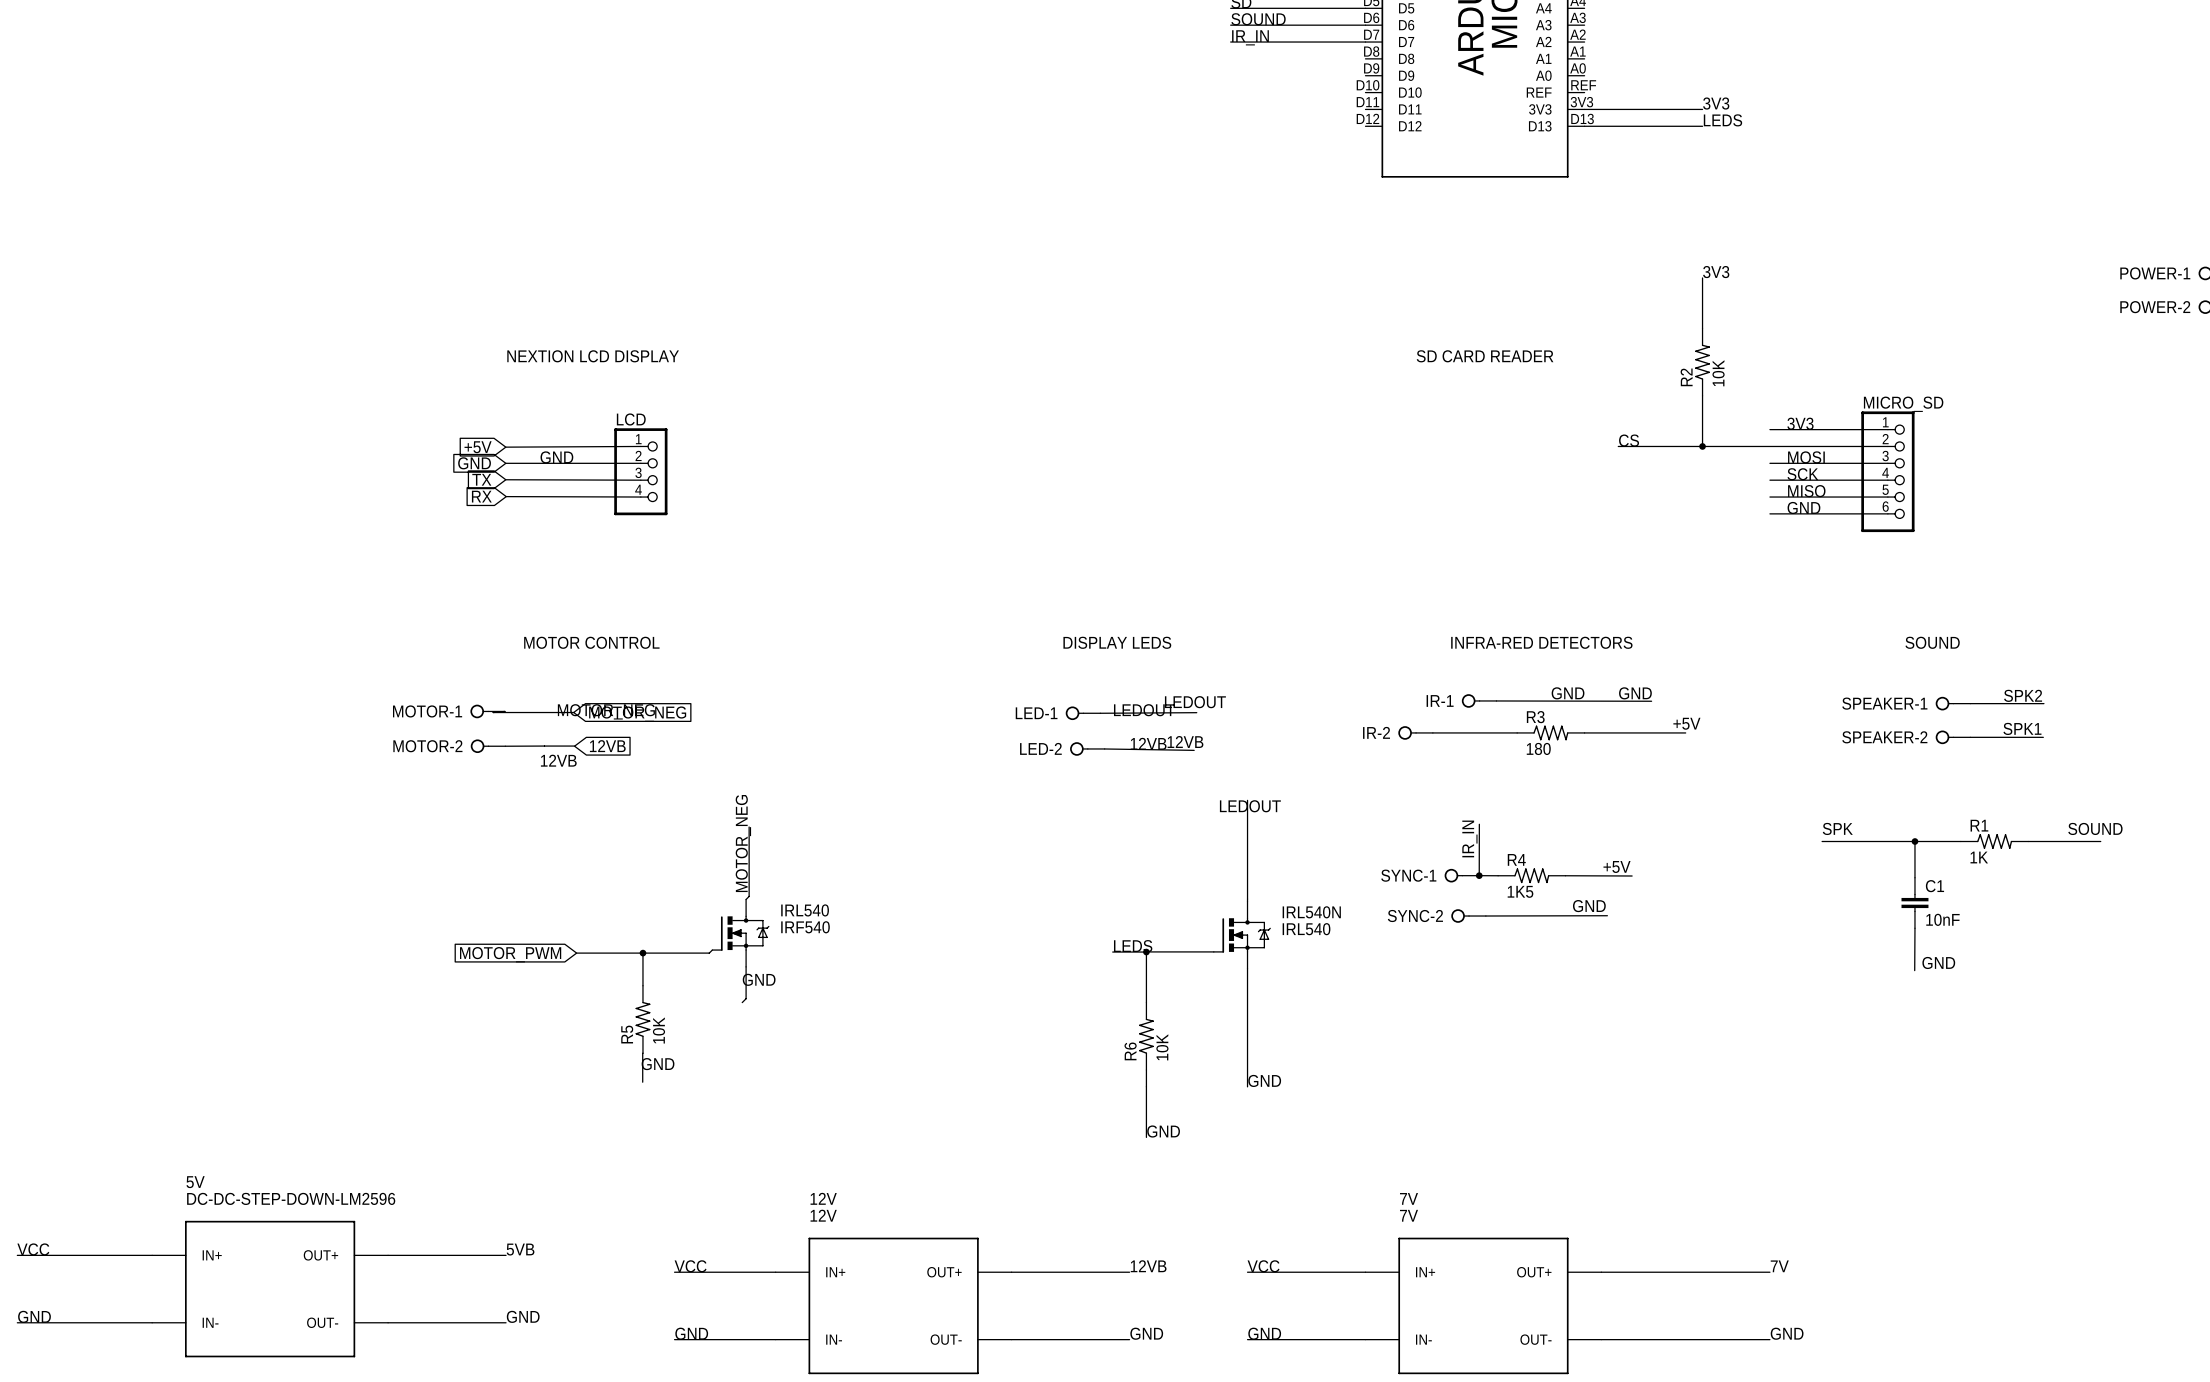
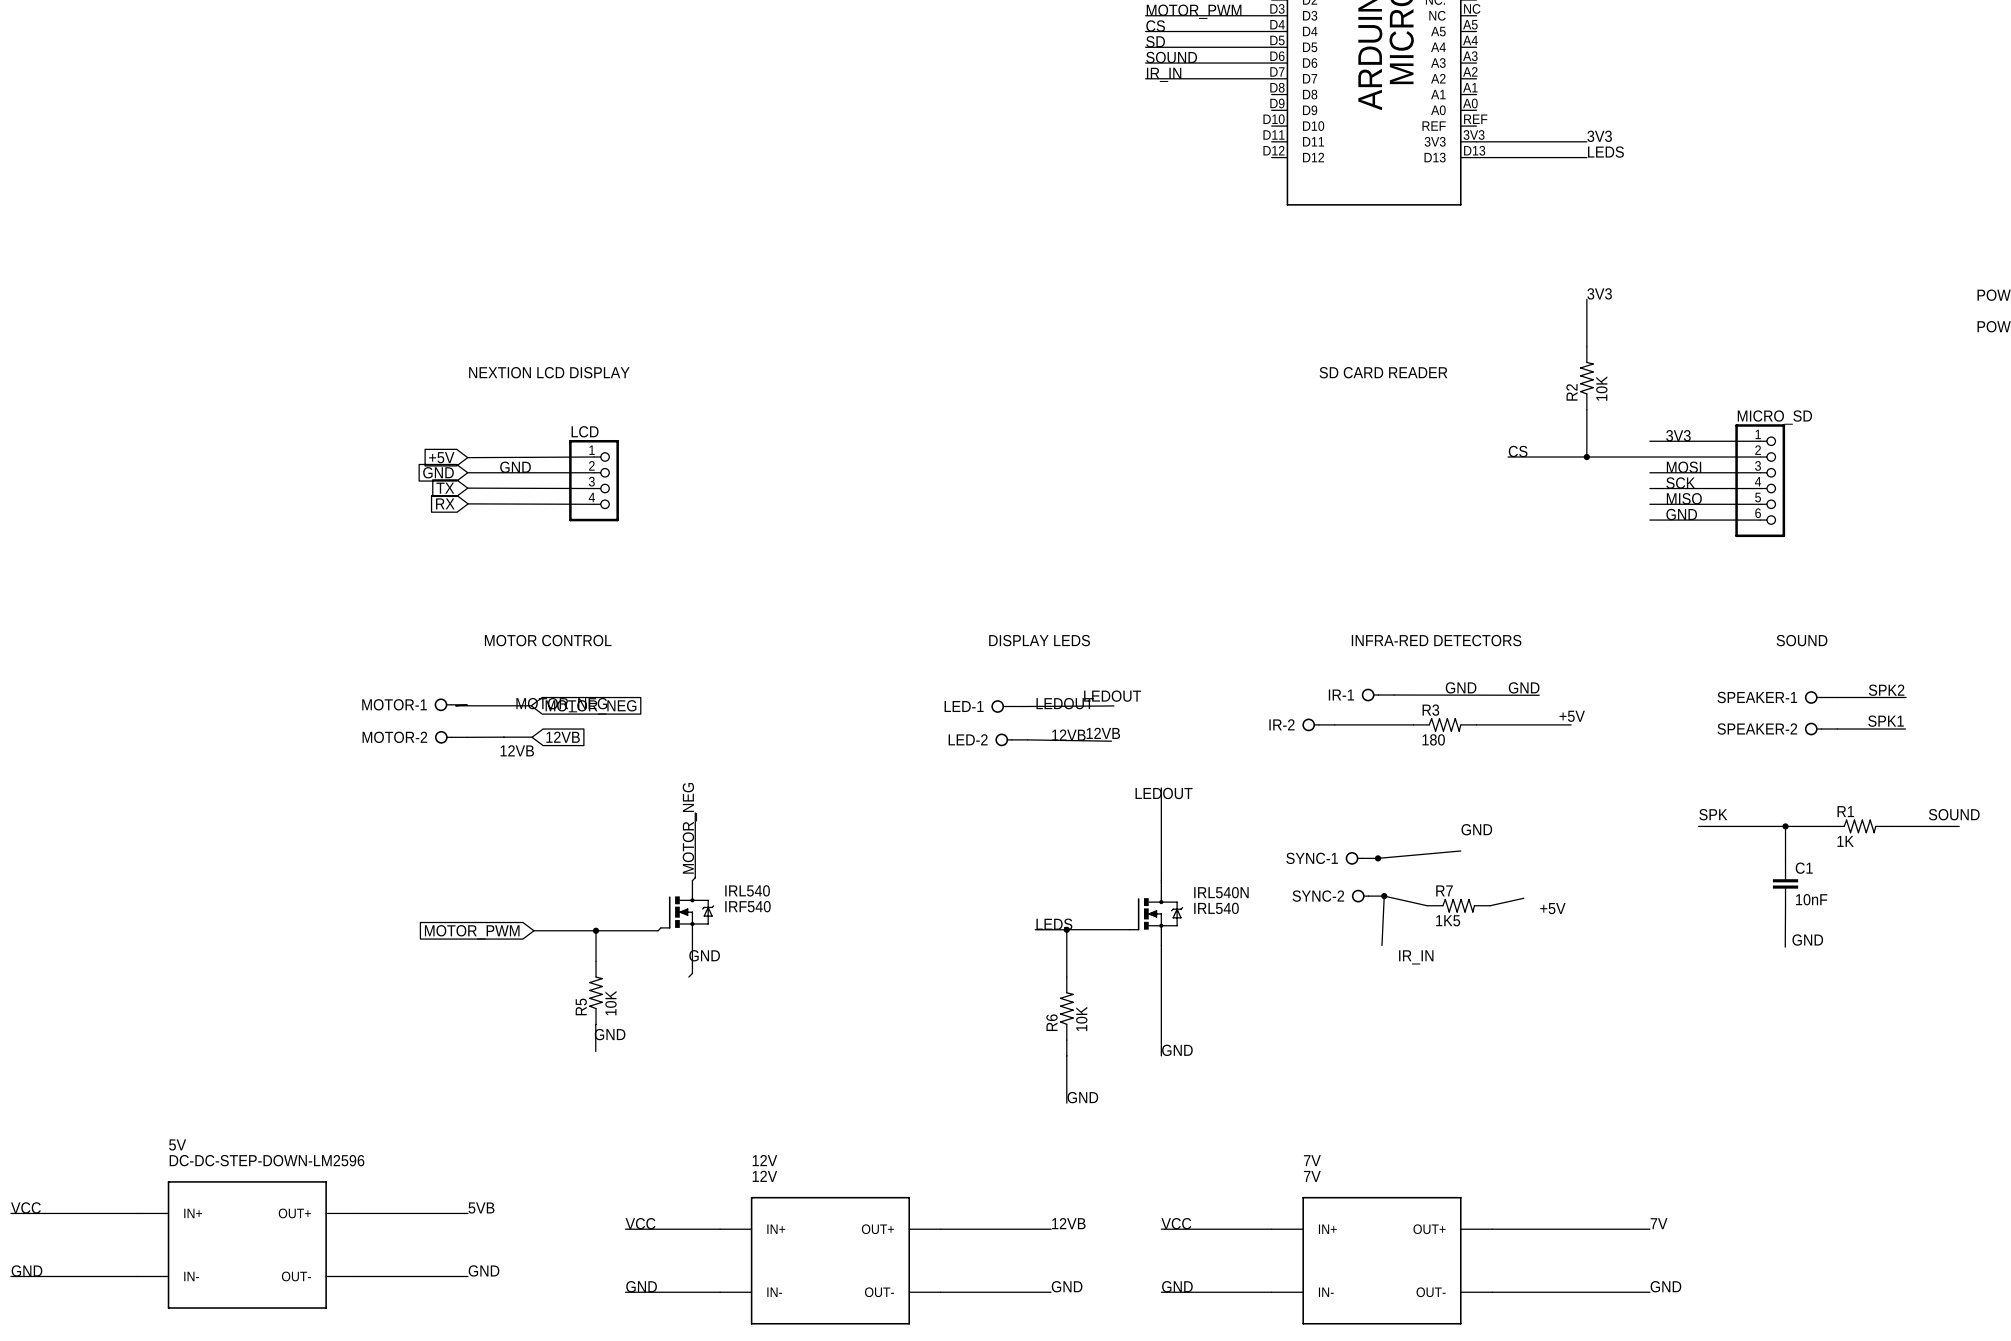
wire: (1479, 824) (1479, 875) (1498, 875) -> none
label rotation: 0° (1469, 838) -> 90° clockwise (1416, 957)
label position: IR_IN (1469, 838) -> IR_IN (1416, 957)
label position: +5V (1617, 866) -> +5V (1552, 908)
wire: none -> (1460, 850) (1378, 858)
R4: 1K5 (1531, 875) -> none
wire: (1565, 875) (1632, 876) -> none
label position: GND (1589, 906) -> GND (1476, 829)
wire: (1607, 915) (1485, 916) -> none
junction: none -> (1384, 896)
wire: none -> (1523, 898) (1490, 905)
wire: none -> (1427, 905) (1384, 896) (1381, 945)
R7: none -> 1K5 (1458, 905)

